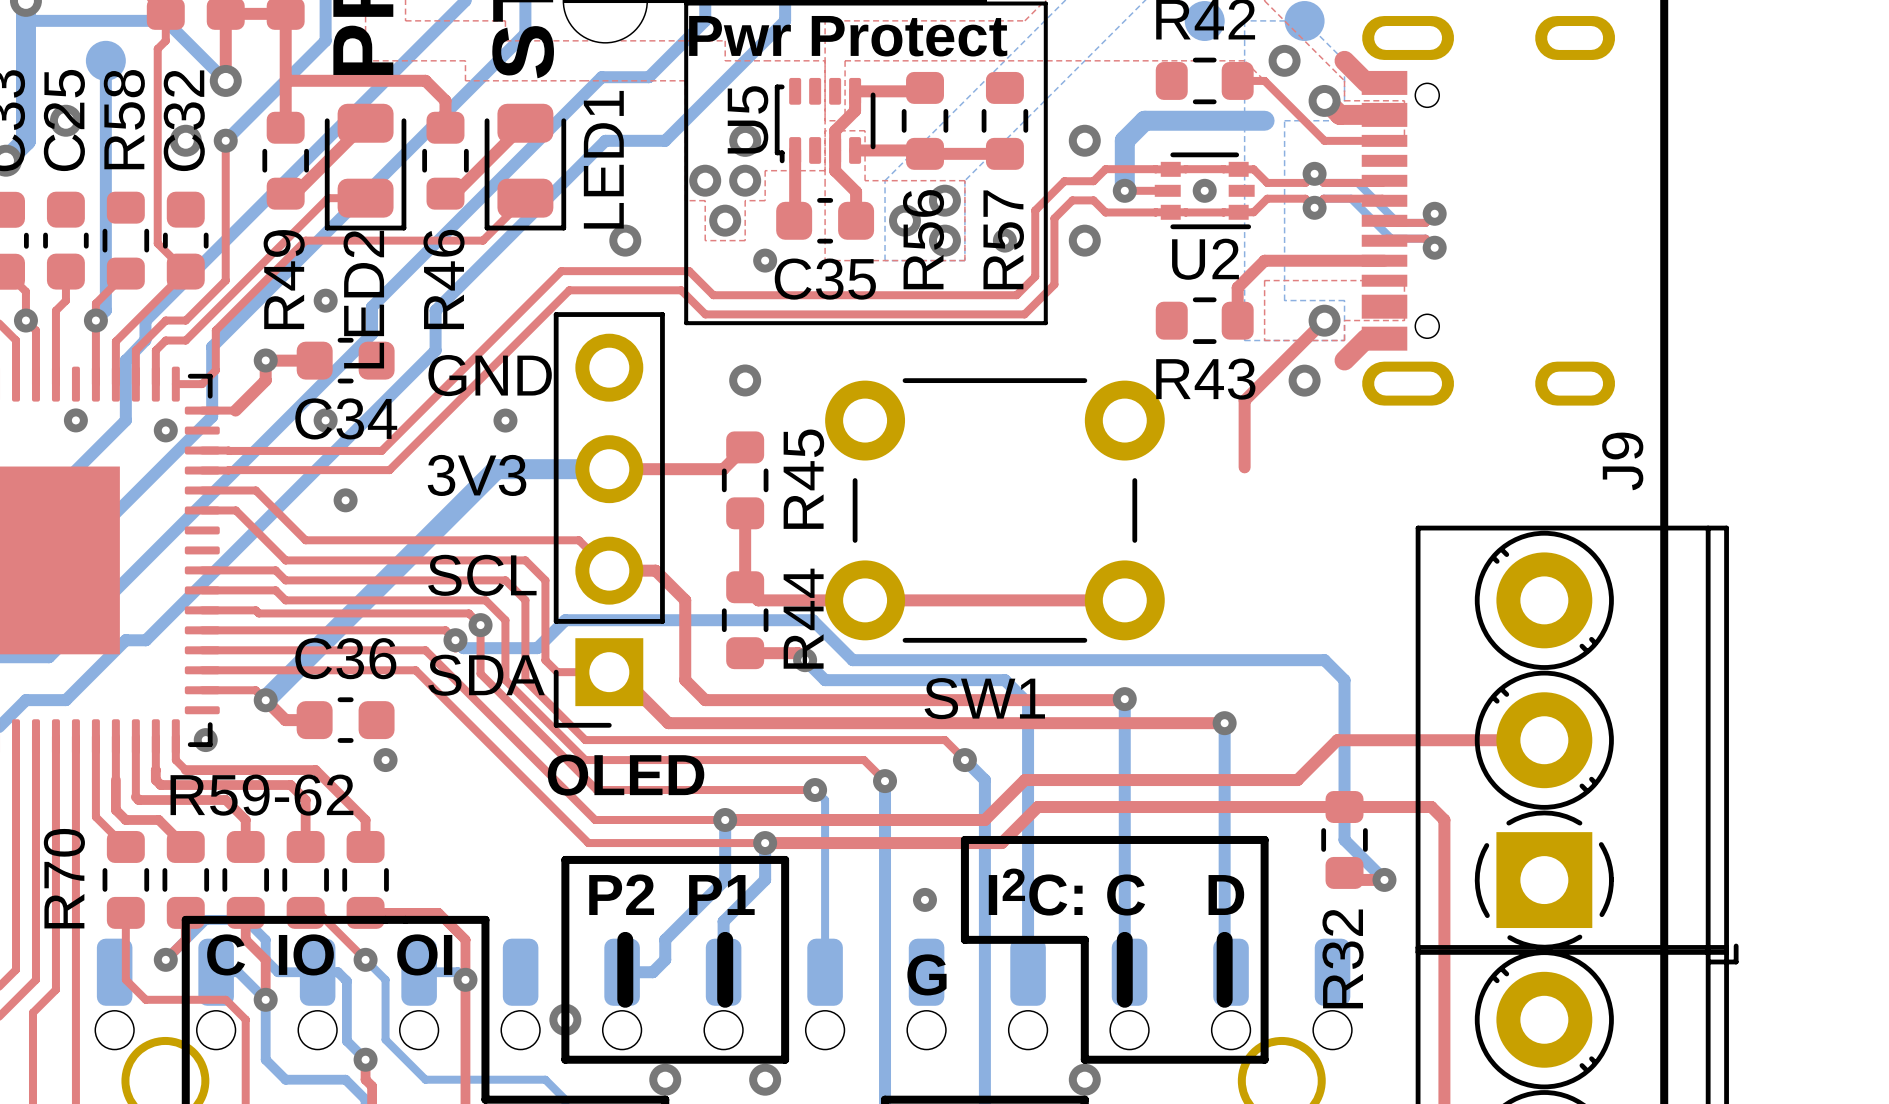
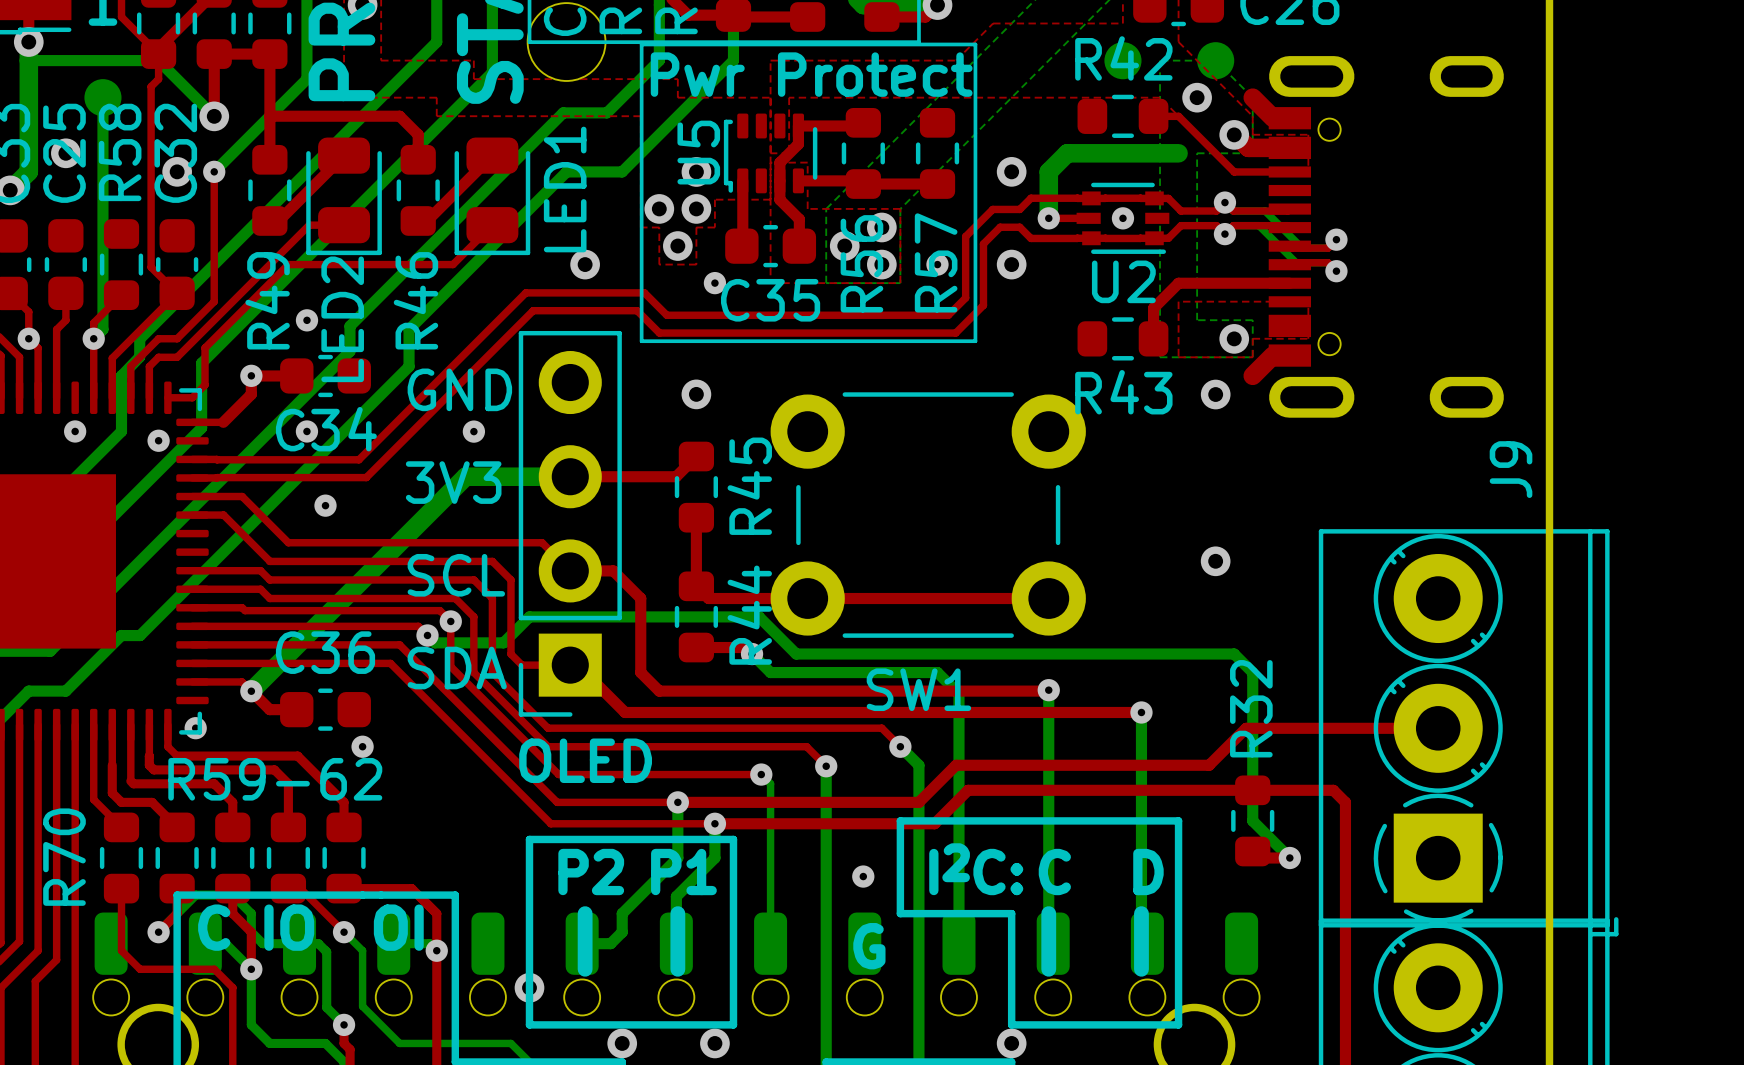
top track: (1324, 320) (1244, 400) (1244, 467) -> none
via: none -> (1215, 561)
R32 name position: R32 (1343, 958) -> R32 (1251, 708)

